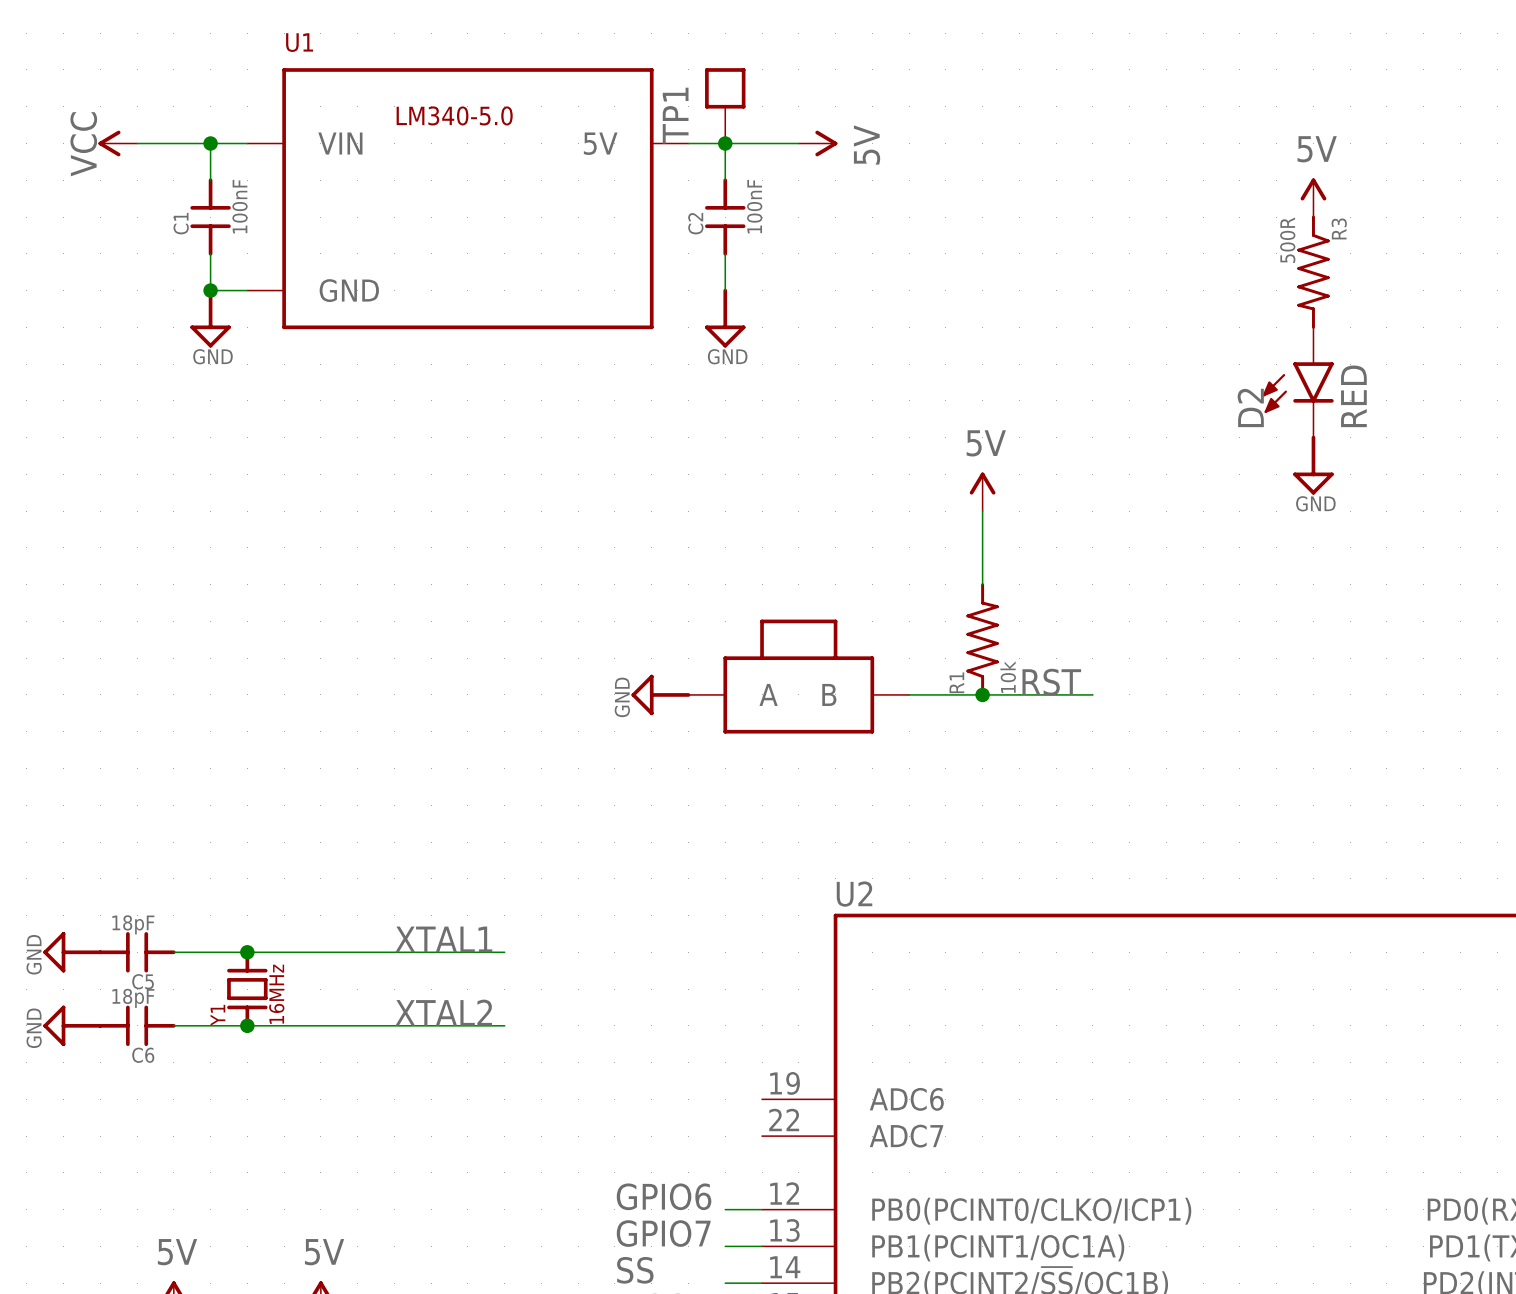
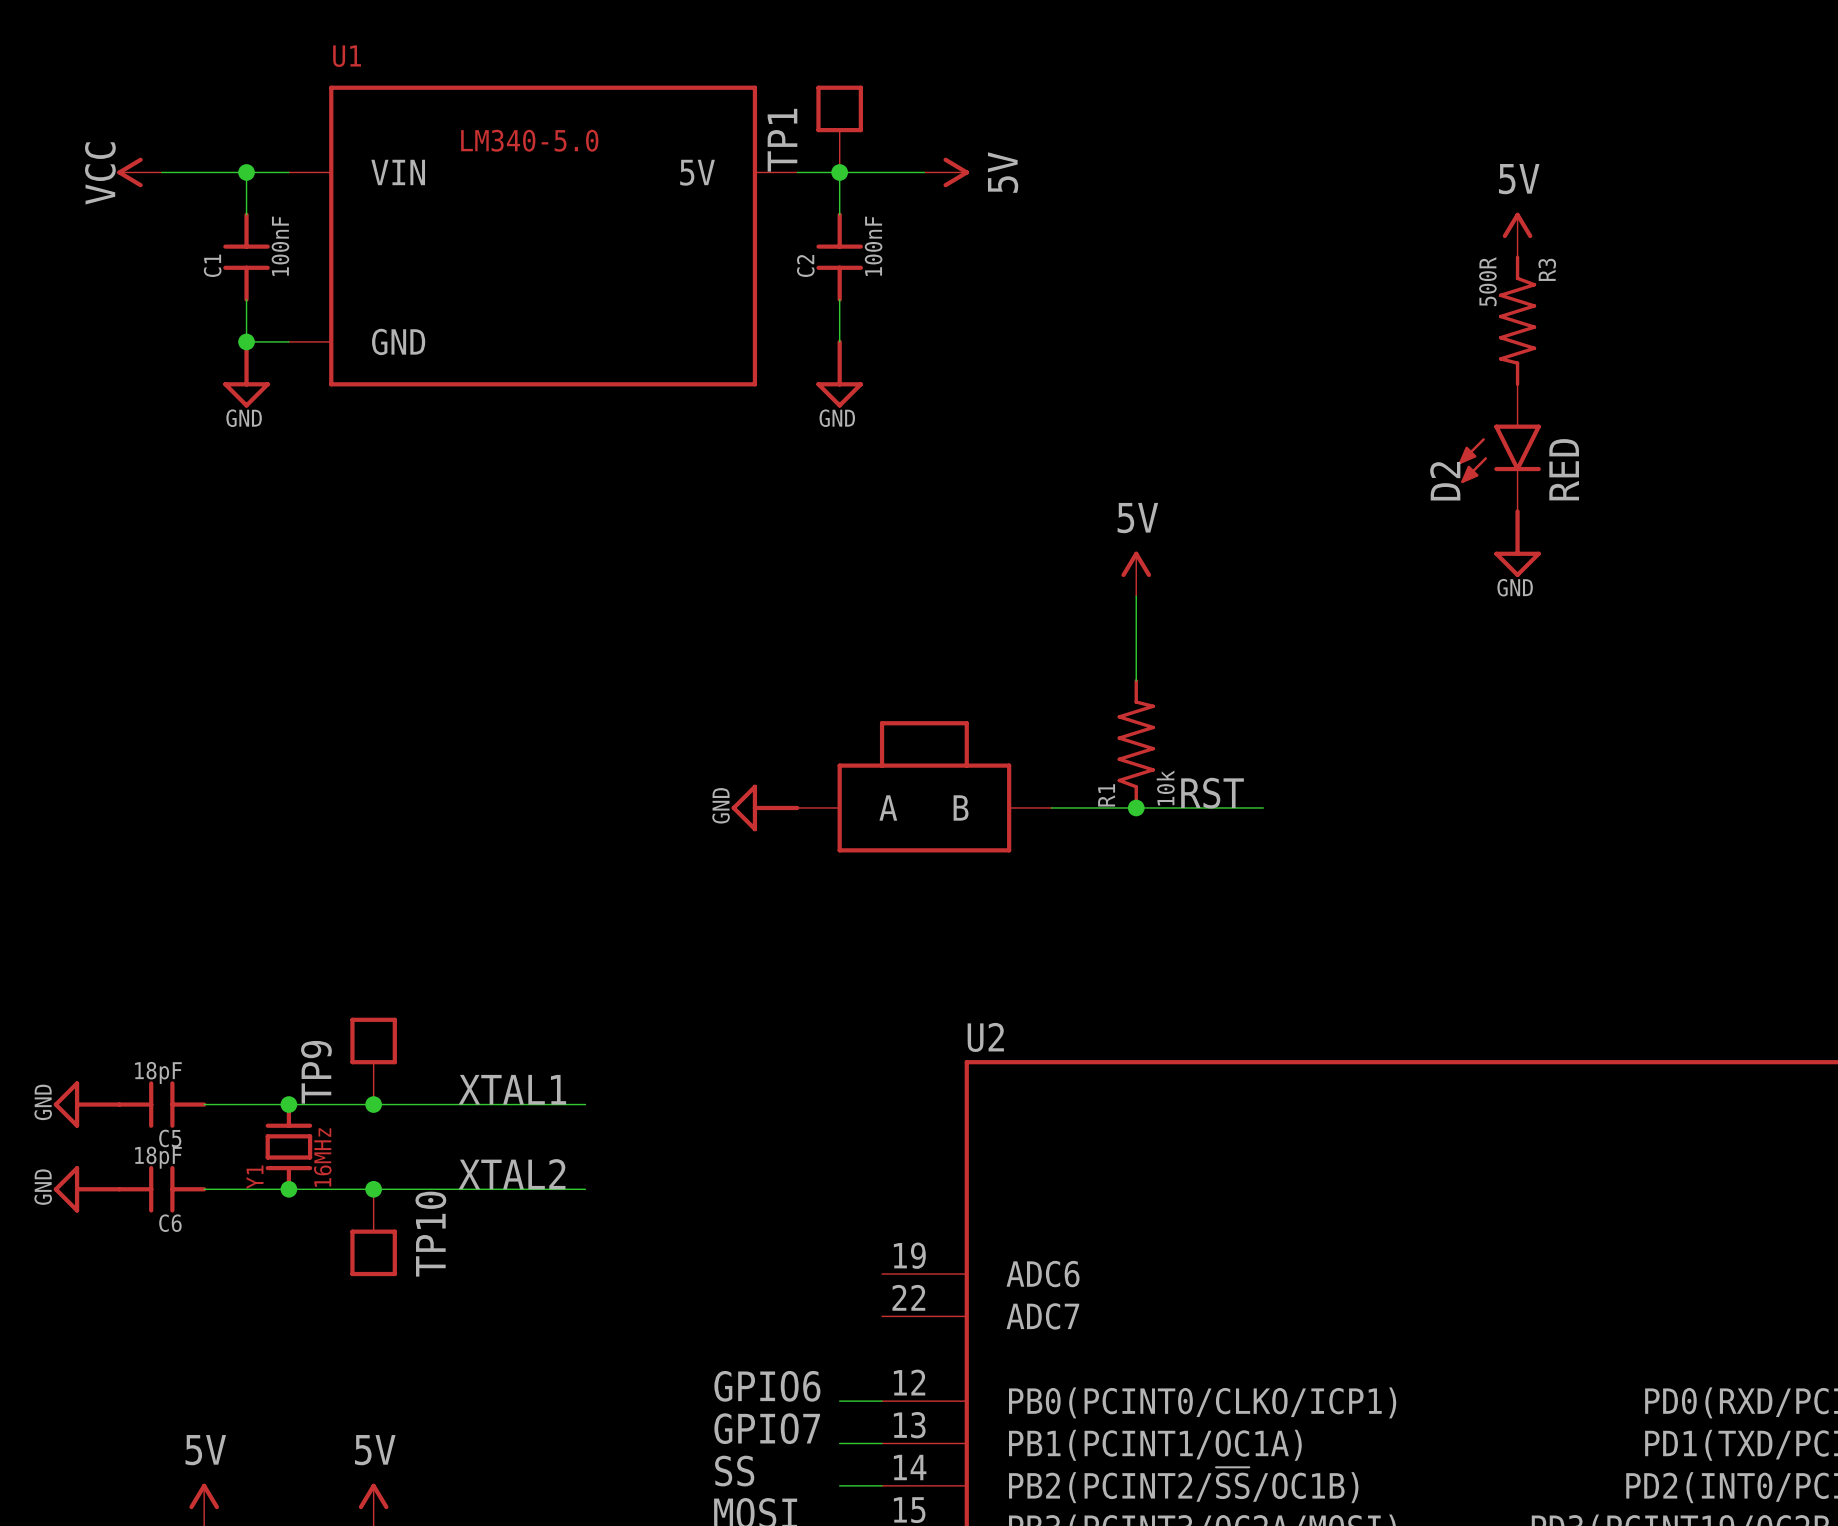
TP9: none -> (373, 1061)
junction: none -> (373, 1104)
junction: none -> (373, 1189)
TP10: none -> (373, 1232)

